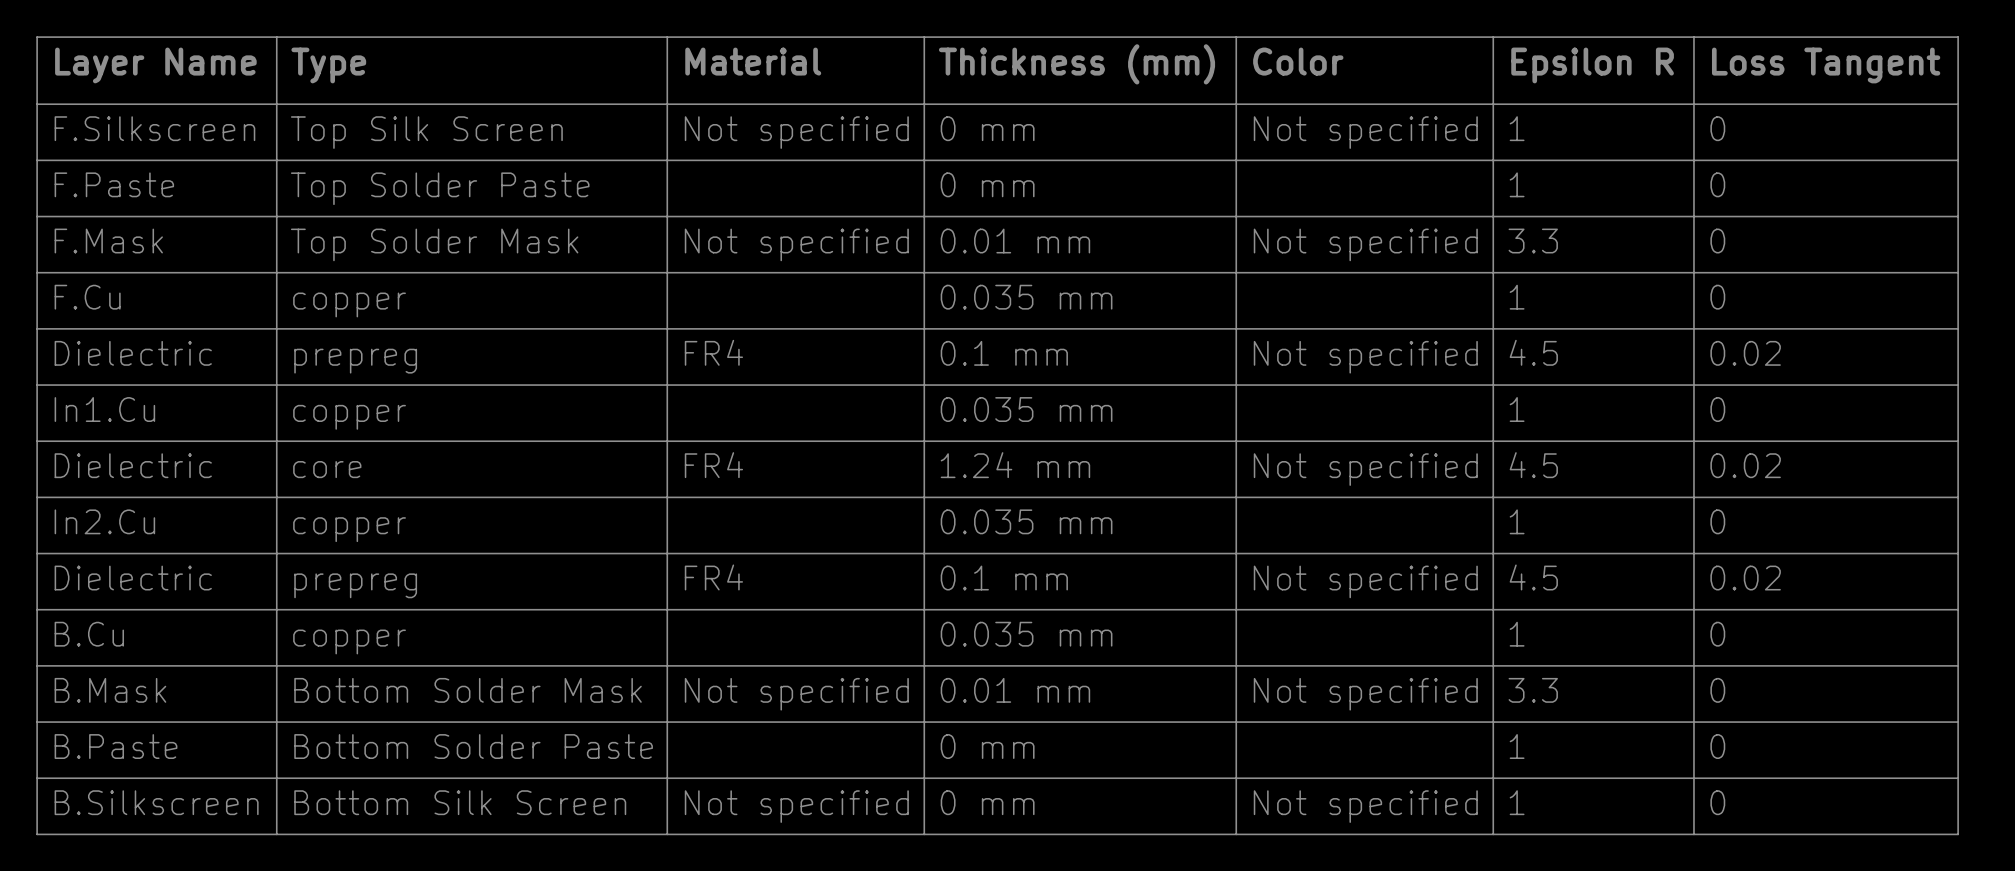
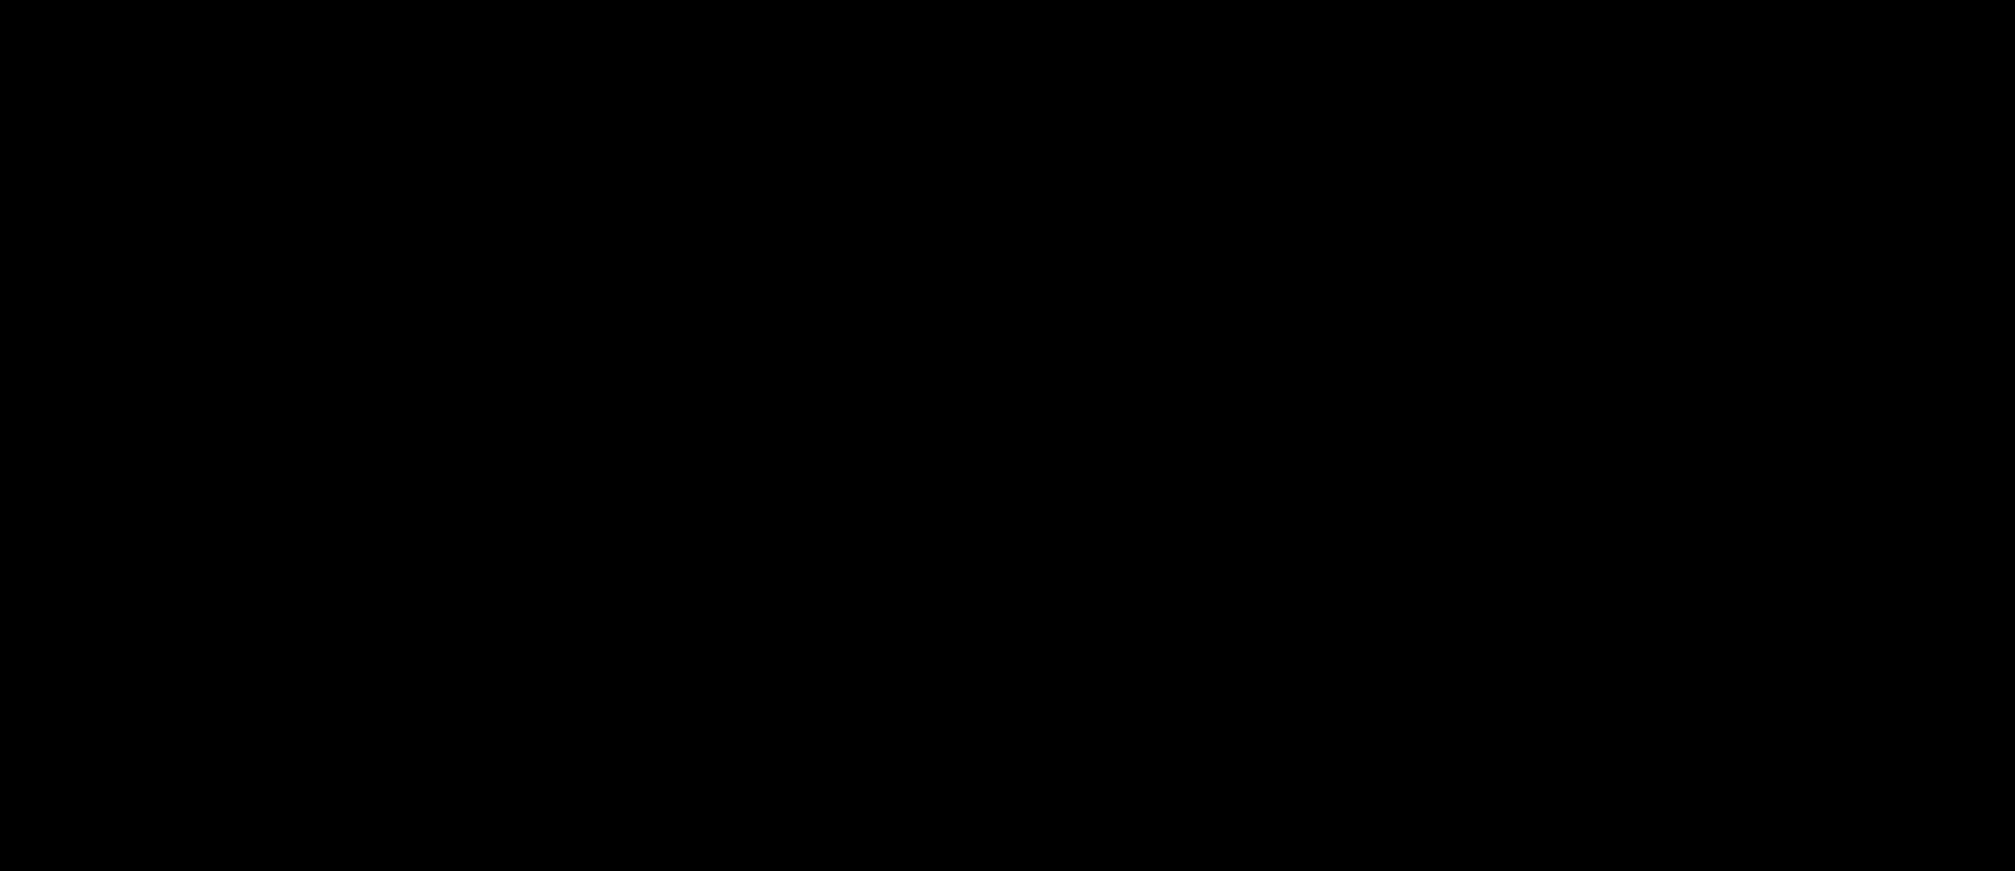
line: (37, 37) (37, 834) (1958, 834) (1958, 37) (37, 37) -> none
line: (276, 37) (276, 834) -> none
line: (667, 37) (667, 834) -> none
line: (924, 37) (924, 834) -> none
line: (1236, 37) (1236, 834) -> none
line: (1493, 37) (1493, 834) -> none
line: (1693, 37) (1693, 834) -> none
text: Material (753, 61) -> none
text: Color (1298, 61) -> none
text: Thickness (mm) (1077, 64) -> none
text: Layer Name (155, 65) -> none
text: Type (328, 65) -> none
text: Epsilon R (1592, 65) -> none
text: Loss Tangent (1826, 65) -> none
line: (37, 104) (1958, 104) -> none
text: F.Silkscreen (154, 128) -> none
text: 0 mm (987, 128) -> none
text: 1 (1517, 128) -> none
text: 0 (1717, 128) -> none
text: Top Silk Screen (426, 132) -> none
text: Not specified (796, 132) -> none
text: Not specified (1365, 132) -> none
line: (37, 160) (1958, 160) -> none
text: F.Paste (114, 184) -> none
text: 0 mm (987, 184) -> none
text: 1 (1517, 184) -> none
text: 0 (1717, 184) -> none
text: Top Solder Paste (440, 188) -> none
line: (37, 216) (1958, 216) -> none
text: F.Mask (108, 241) -> none
text: 0.01 mm (1015, 241) -> none
text: 3.3 (1533, 241) -> none
text: 0 (1717, 241) -> none
text: Top Solder Mask (434, 244) -> none
text: Not specified (796, 244) -> none
text: Not specified (1365, 244) -> none
line: (37, 272) (1958, 272) -> none
text: F.Cu (87, 297) -> none
text: 0.035 mm (1026, 297) -> none
text: 1 (1517, 297) -> none
text: 0 (1717, 297) -> none
text: copper (349, 304) -> none
line: (37, 328) (1958, 328) -> none
text: FR4 (713, 352) -> none
text: 4.5 (1533, 352) -> none
text: Dielectric (133, 353) -> none
text: 0.1 mm (1004, 353) -> none
text: 0.02 (1745, 353) -> none
text: Not specified (1365, 357) -> none
text: prepreg (355, 361) -> none
line: (37, 385) (1958, 385) -> none
text: In1.Cu (104, 409) -> none
text: 0.035 mm (1026, 409) -> none
text: 1 (1517, 409) -> none
text: 0 (1717, 409) -> none
text: copper (349, 417) -> none
line: (37, 441) (1958, 441) -> none
text: Dielectric (133, 465) -> none
text: FR4 (713, 465) -> none
text: 1.24 mm (1015, 465) -> none
text: 4.5 (1533, 465) -> none
text: 0.02 (1745, 465) -> none
text: core (327, 469) -> none
text: Not specified (1365, 469) -> none
line: (37, 497) (1958, 497) -> none
text: In2.Cu (104, 521) -> none
text: 0.035 mm (1026, 521) -> none
text: 1 (1517, 521) -> none
text: 0 (1717, 521) -> none
text: copper (349, 529) -> none
line: (37, 553) (1958, 553) -> none
text: FR4 (713, 577) -> none
text: 4.5 (1533, 577) -> none
text: Dielectric (133, 578) -> none
text: 0.1 mm (1004, 578) -> none
text: 0.02 (1745, 578) -> none
text: Not specified (1365, 581) -> none
text: prepreg (355, 585) -> none
line: (37, 609) (1958, 609) -> none
text: B.Cu (89, 634) -> none
text: 0.035 mm (1026, 634) -> none
text: 1 (1517, 634) -> none
text: 0 (1717, 634) -> none
text: copper (349, 641) -> none
line: (37, 665) (1958, 665) -> none
text: B.Mask (110, 690) -> none
text: Bottom Solder Mask (468, 690) -> none
text: 0.01 mm (1015, 690) -> none
text: 3.3 (1533, 690) -> none
text: 0 (1717, 690) -> none
text: Not specified (796, 694) -> none
text: Not specified (1365, 694) -> none
line: (37, 722) (1958, 722) -> none
text: B.Paste (116, 746) -> none
text: Bottom Solder Paste (473, 746) -> none
text: 0 mm (987, 746) -> none
text: 1 (1517, 746) -> none
text: 0 (1717, 746) -> none
line: (37, 778) (1958, 778) -> none
text: B.Silkscreen (156, 802) -> none
text: Bottom Silk Screen (460, 802) -> none
text: 0 mm (987, 802) -> none
text: 1 (1517, 802) -> none
text: 0 (1717, 802) -> none
text: Not specified (796, 806) -> none
text: Not specified (1365, 806) -> none

